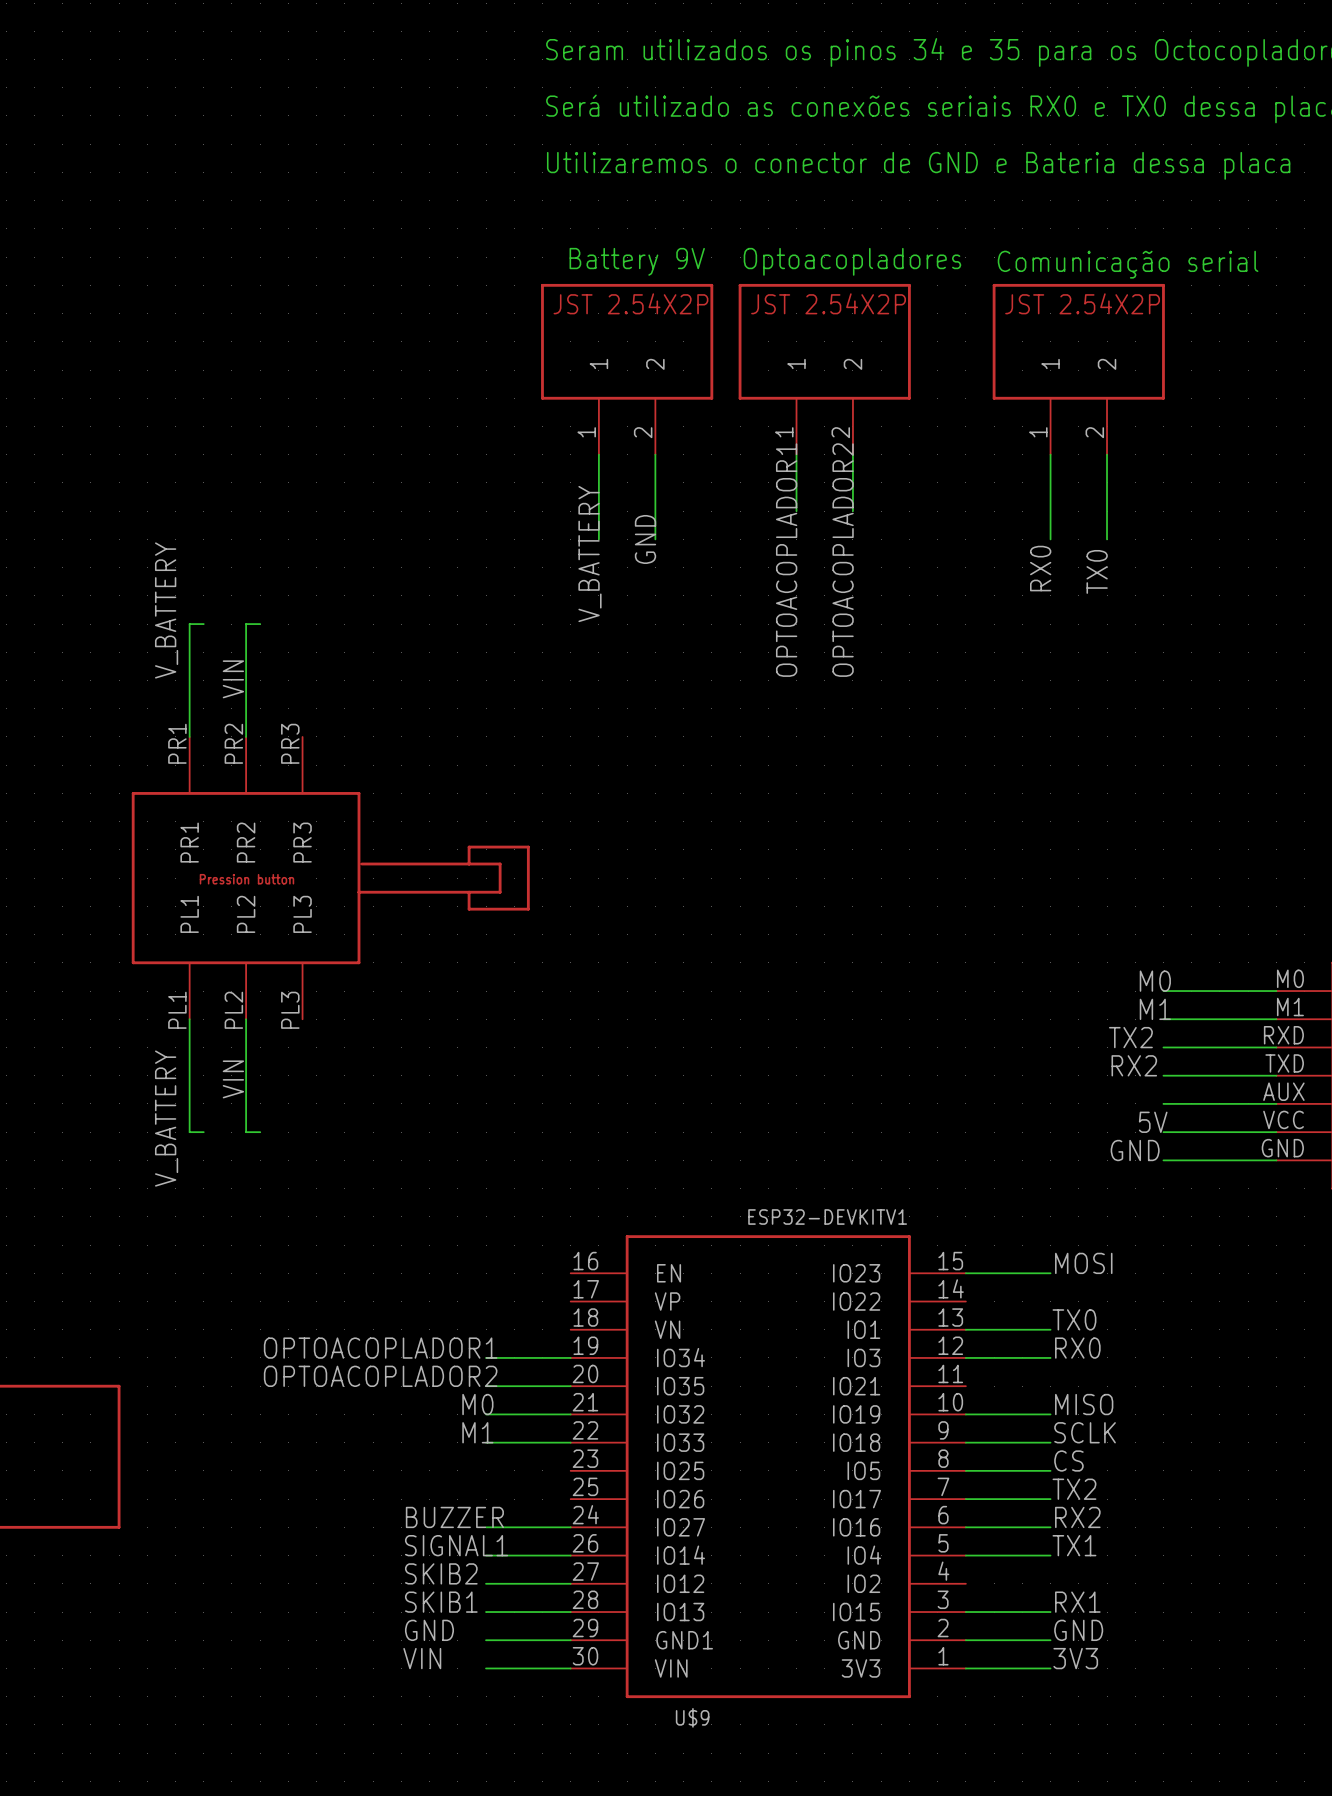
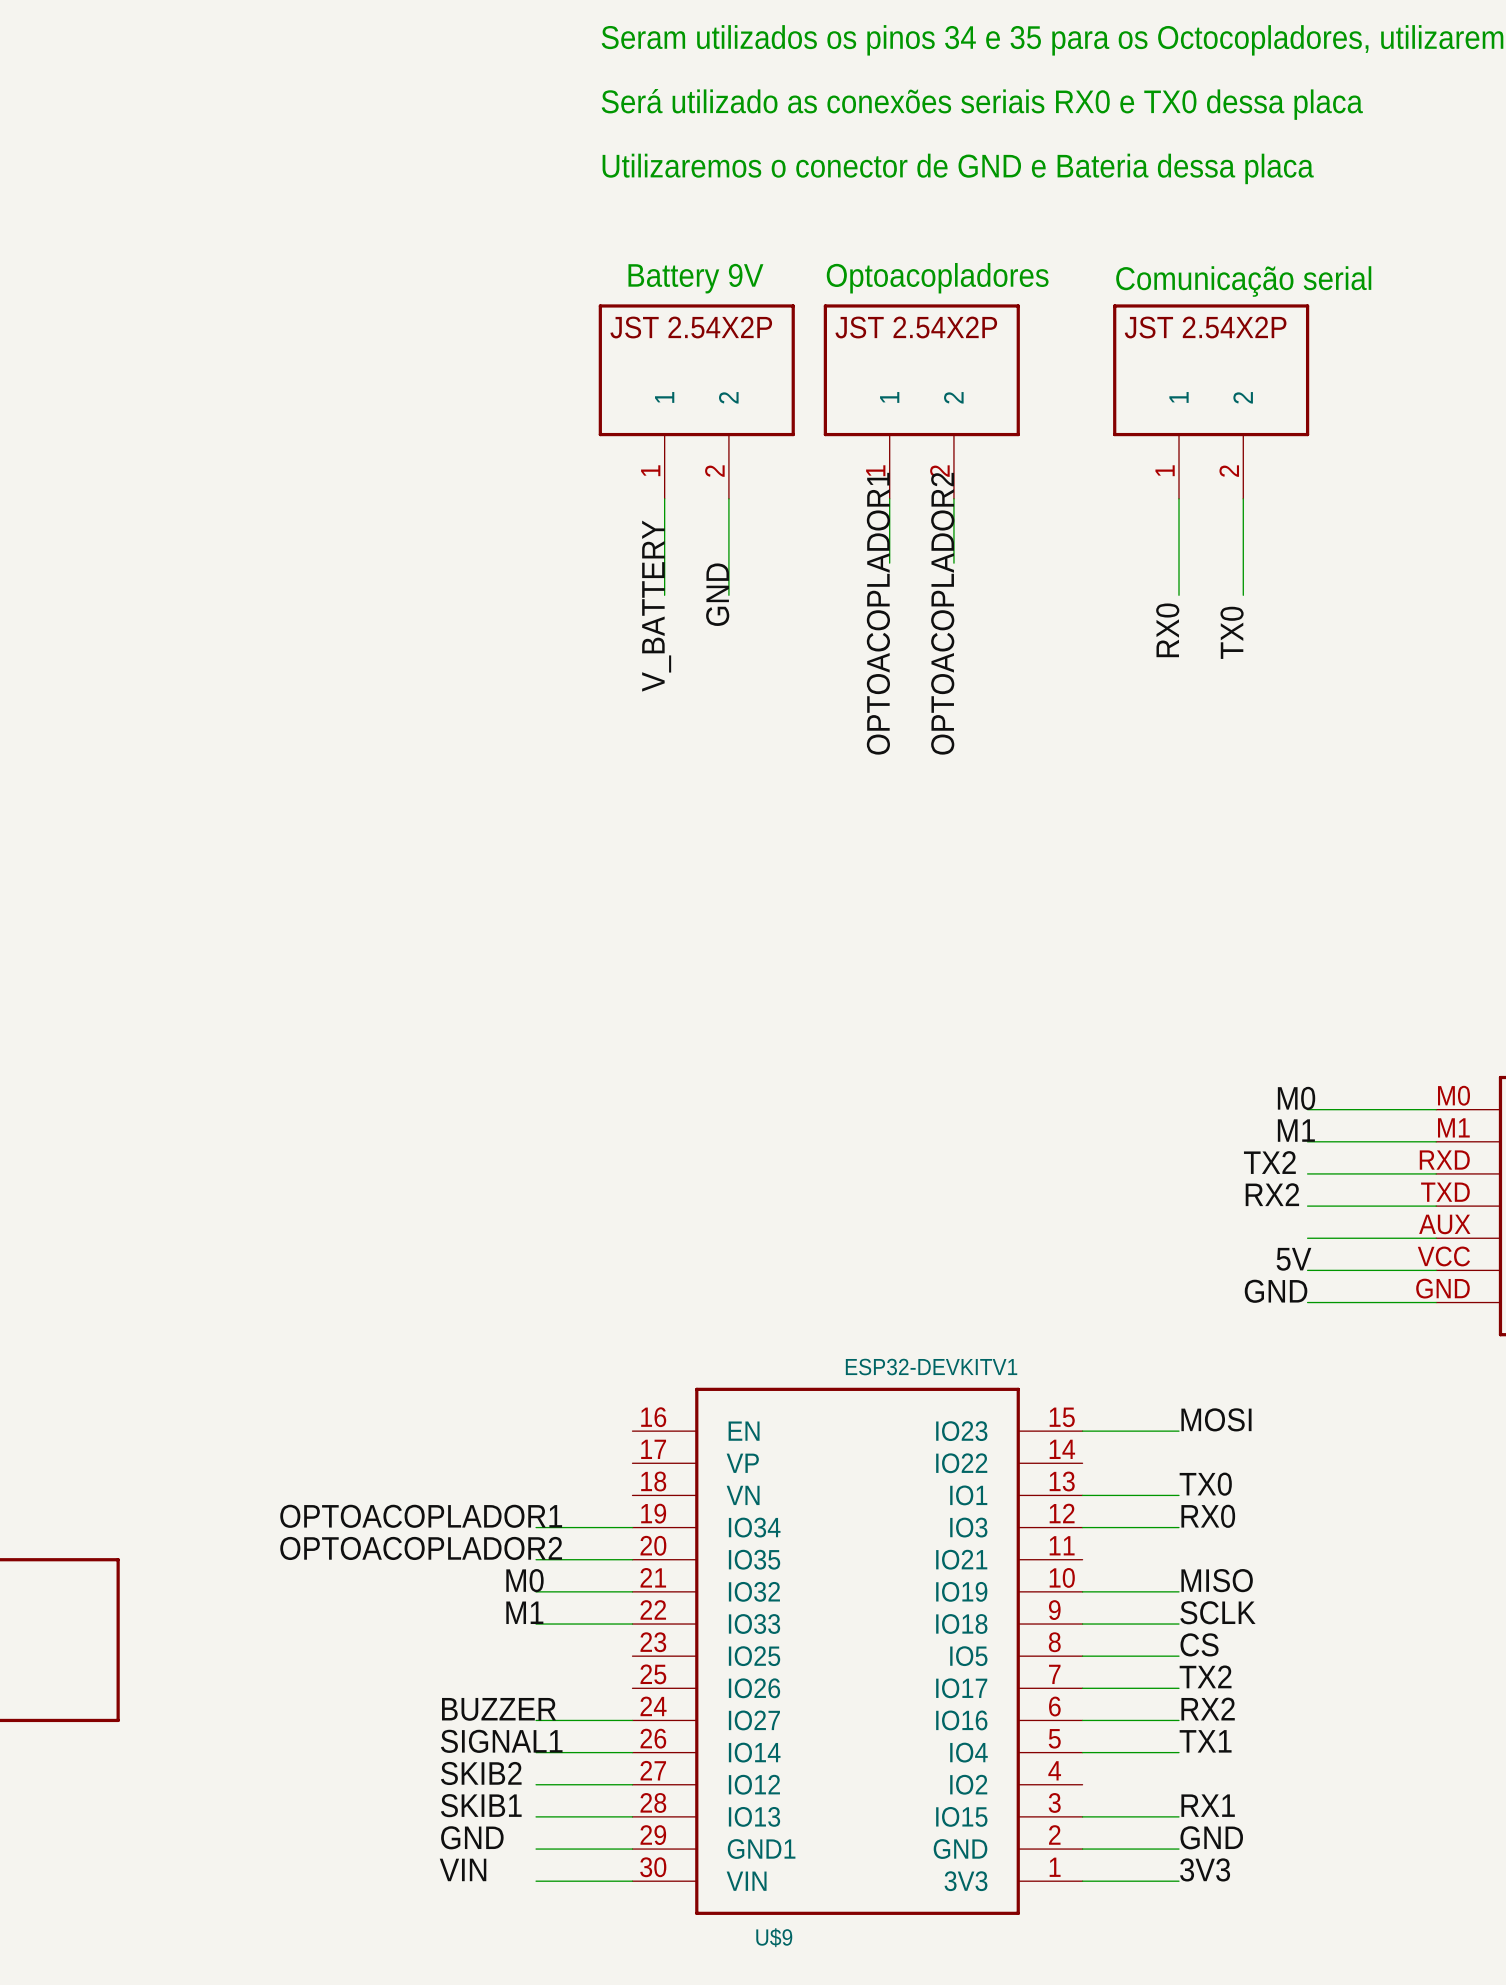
label: V_BATTERY (166, 610) -> none
wire: (203, 624) (189, 624) (189, 736) -> none
wire: (260, 624) (246, 624) (246, 736) -> none
label: VIN (233, 679) -> none
part: (330, 878) -> none
wire: (189, 1019) (189, 1132) (203, 1132) -> none
wire: (246, 1019) (246, 1132) (260, 1132) -> none
label: VIN (233, 1079) -> none
label: V_BATTERY (166, 1118) -> none

